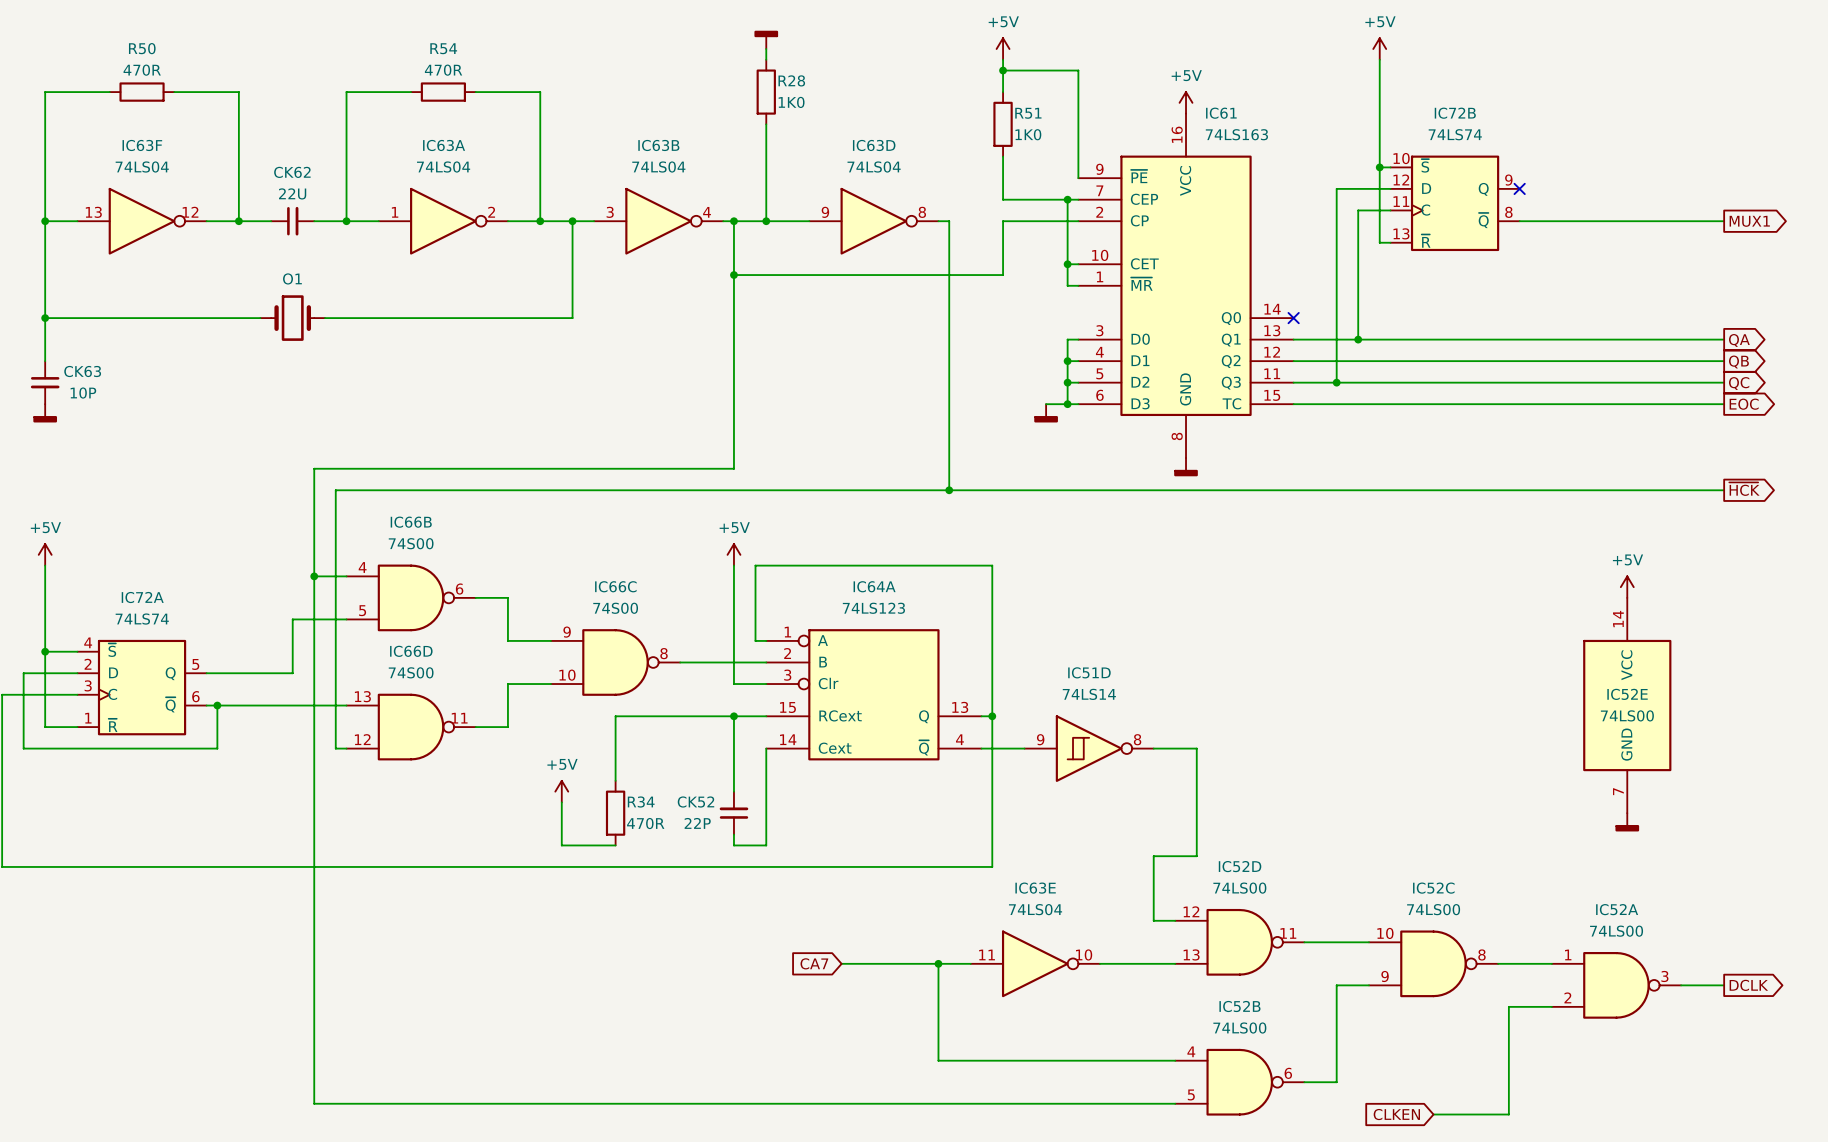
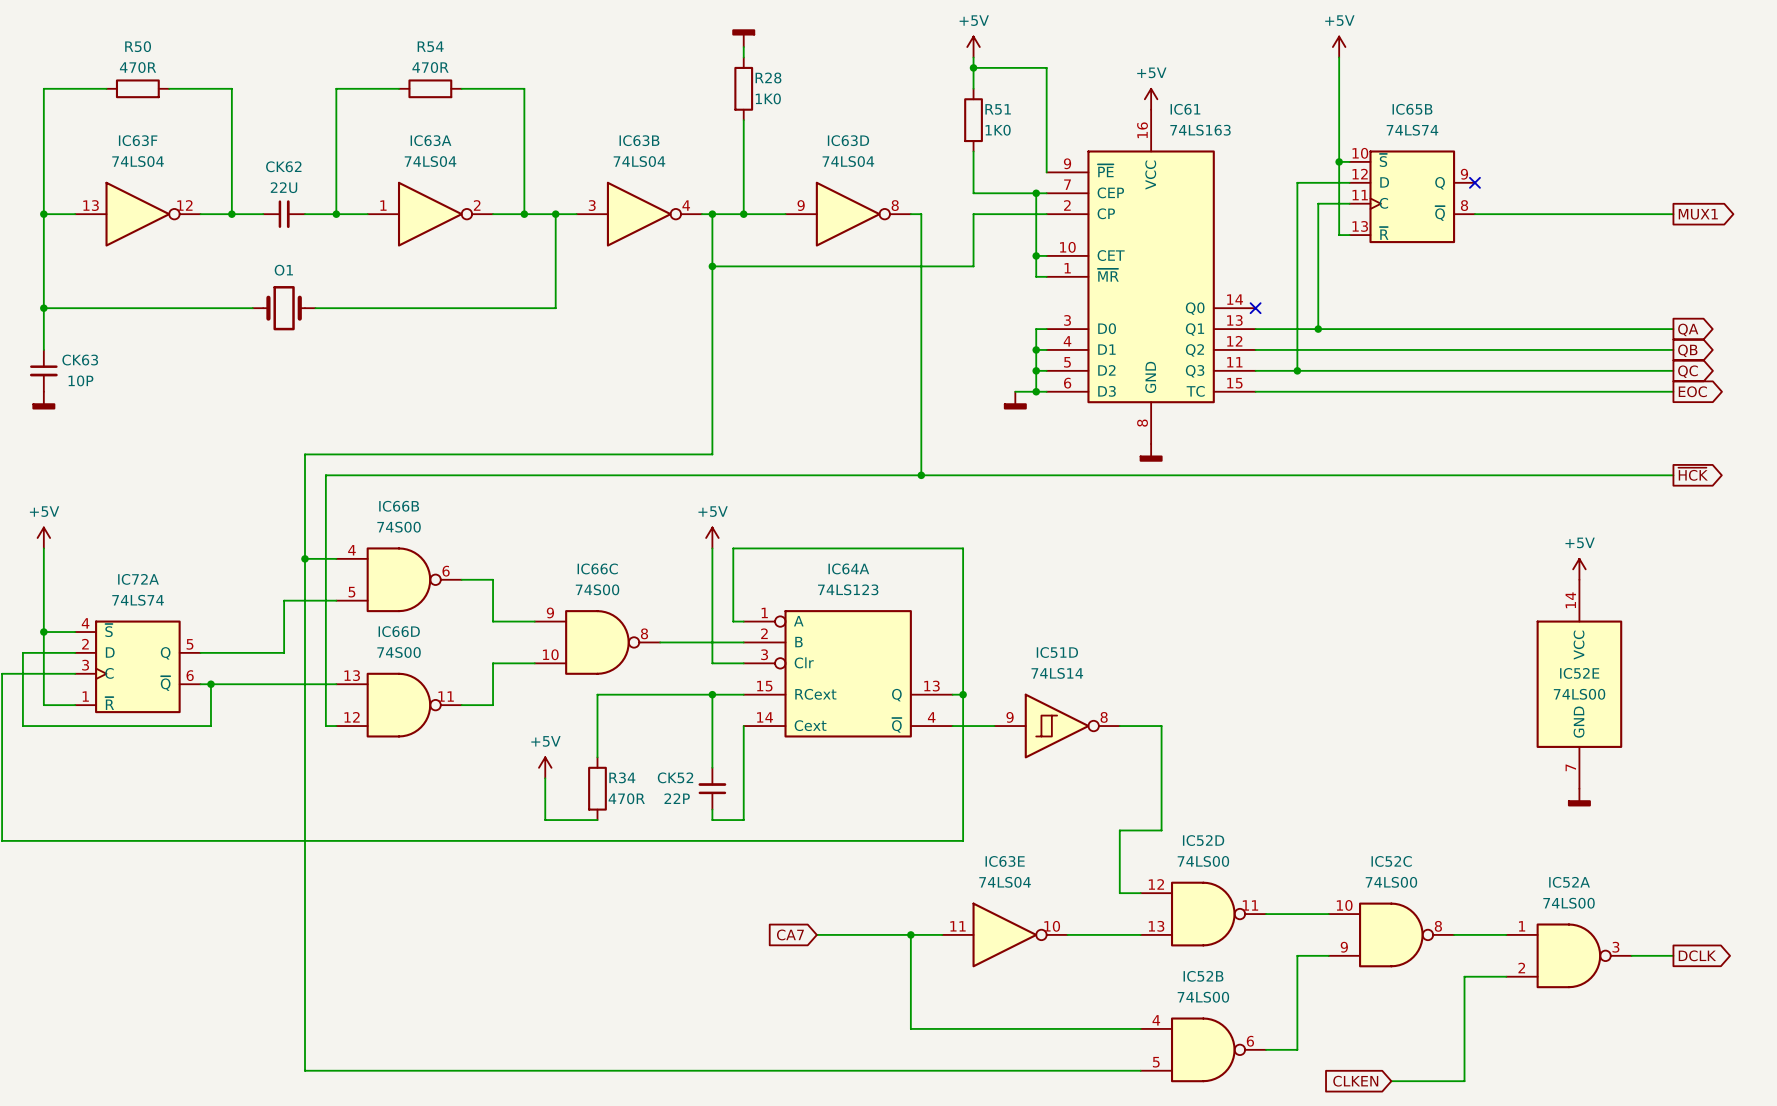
IC72B name: IC72B (1455, 113) -> IC65B (1412, 109)

